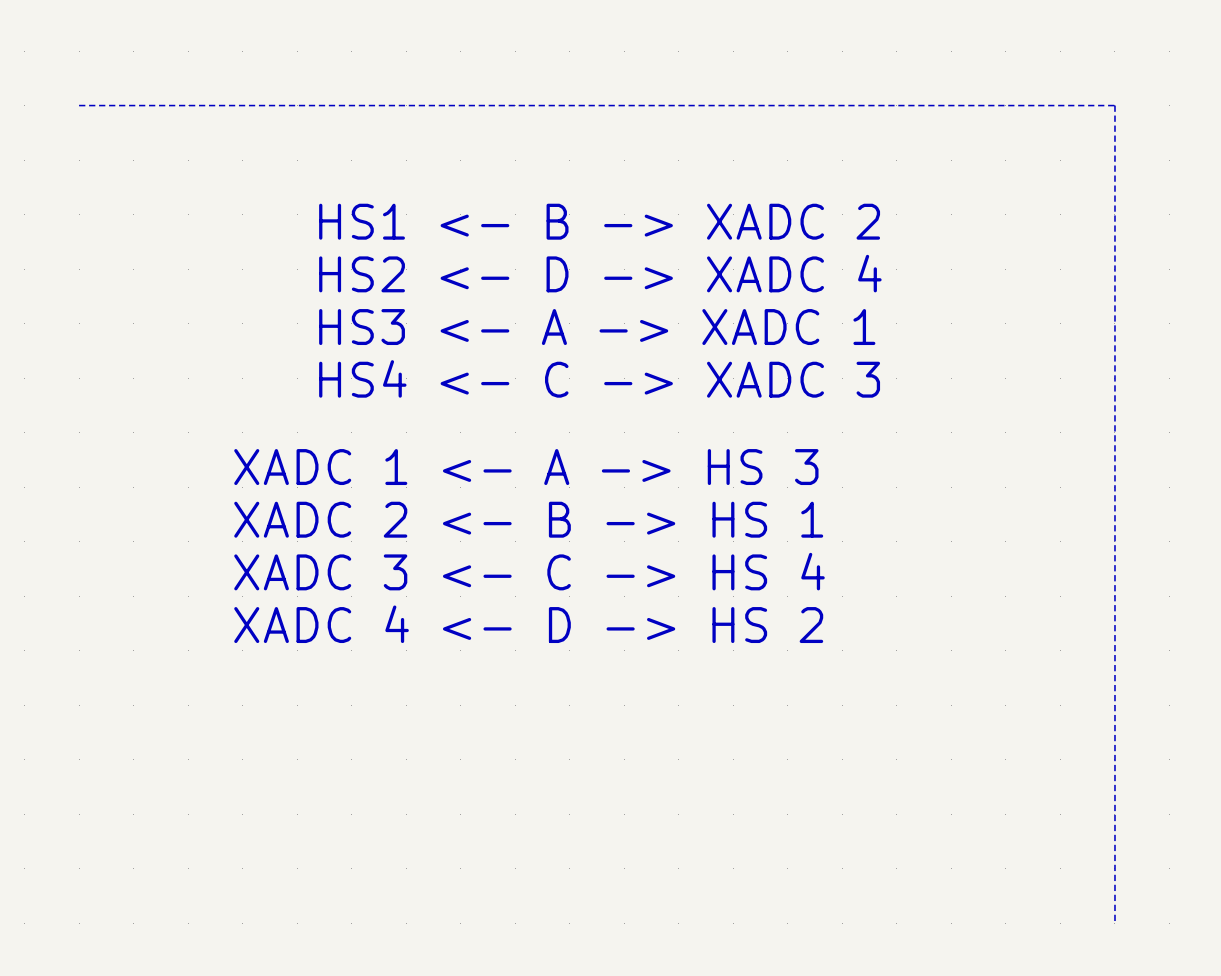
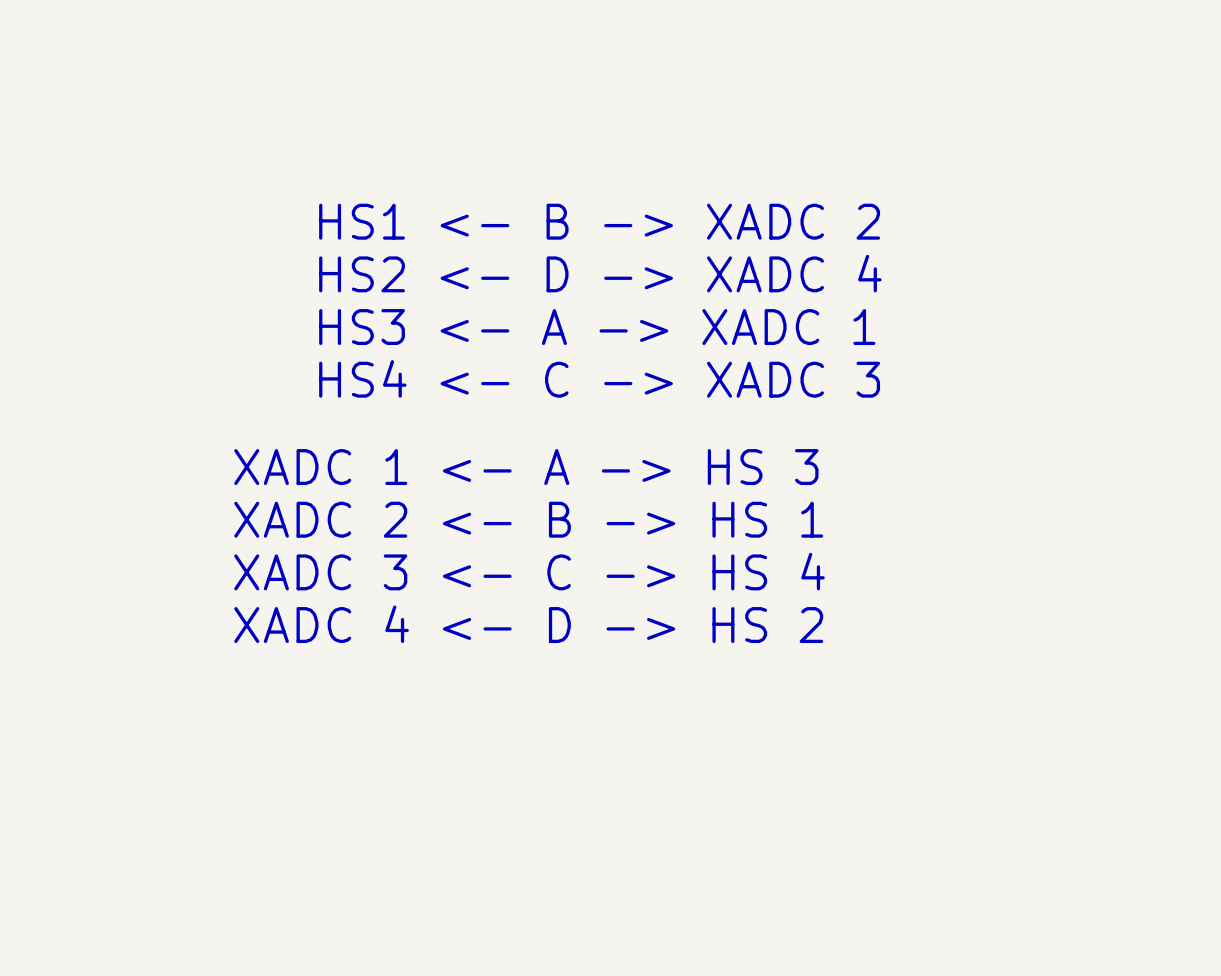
line: (79, 105) (1114, 105) (1114, 923) -> none

